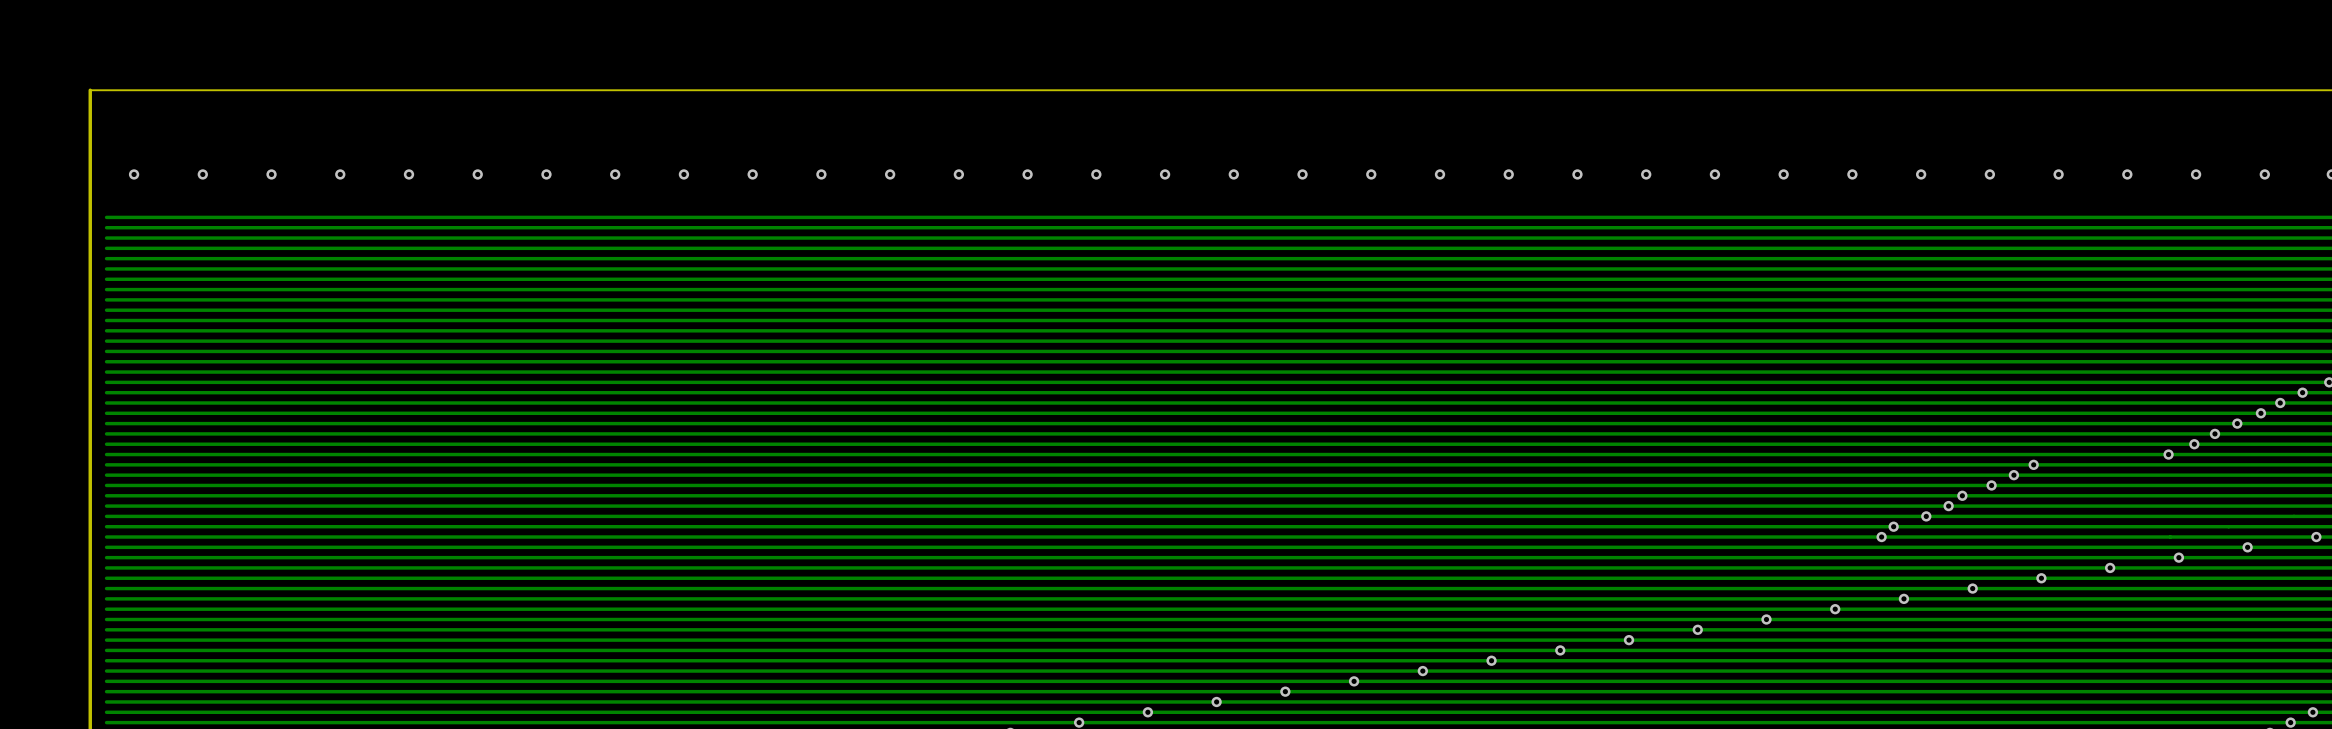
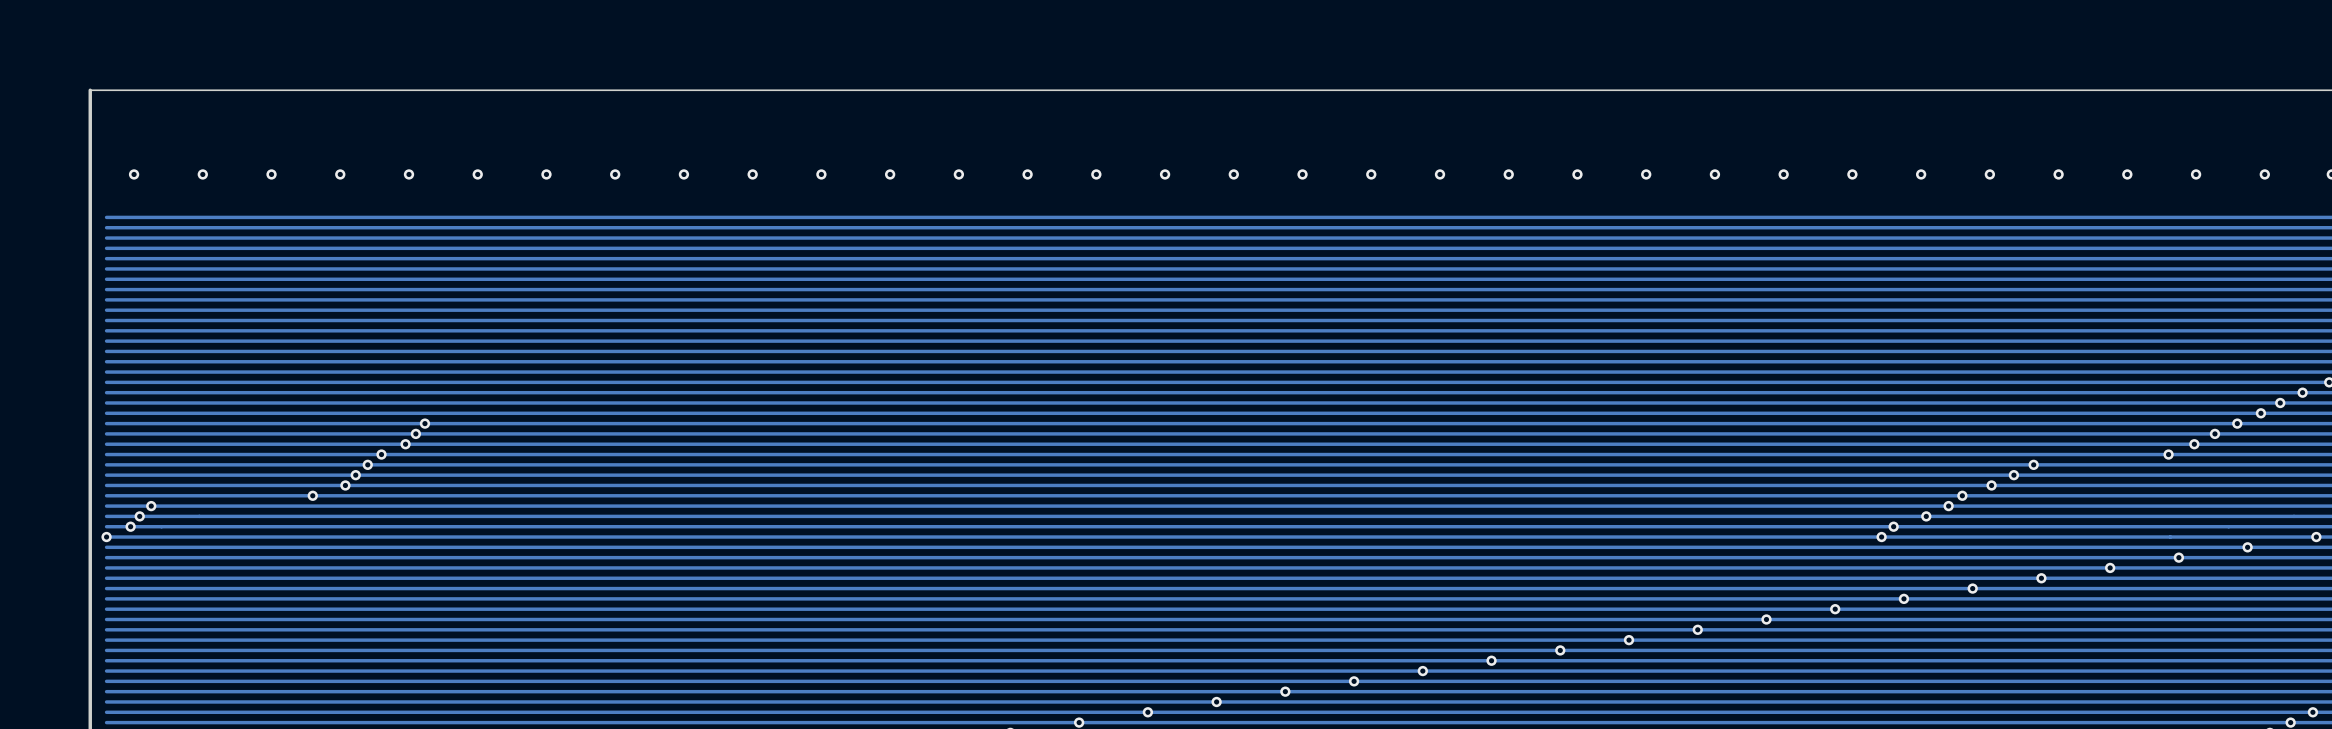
via: none -> (424, 423)
via: none -> (415, 433)
via: none -> (405, 444)
via: none -> (381, 454)
via: none -> (367, 464)
via: none -> (355, 475)
via: none -> (345, 485)
via: none -> (312, 495)
via: none -> (151, 506)
via: none -> (139, 516)
via: none -> (130, 526)
via: none -> (106, 537)

